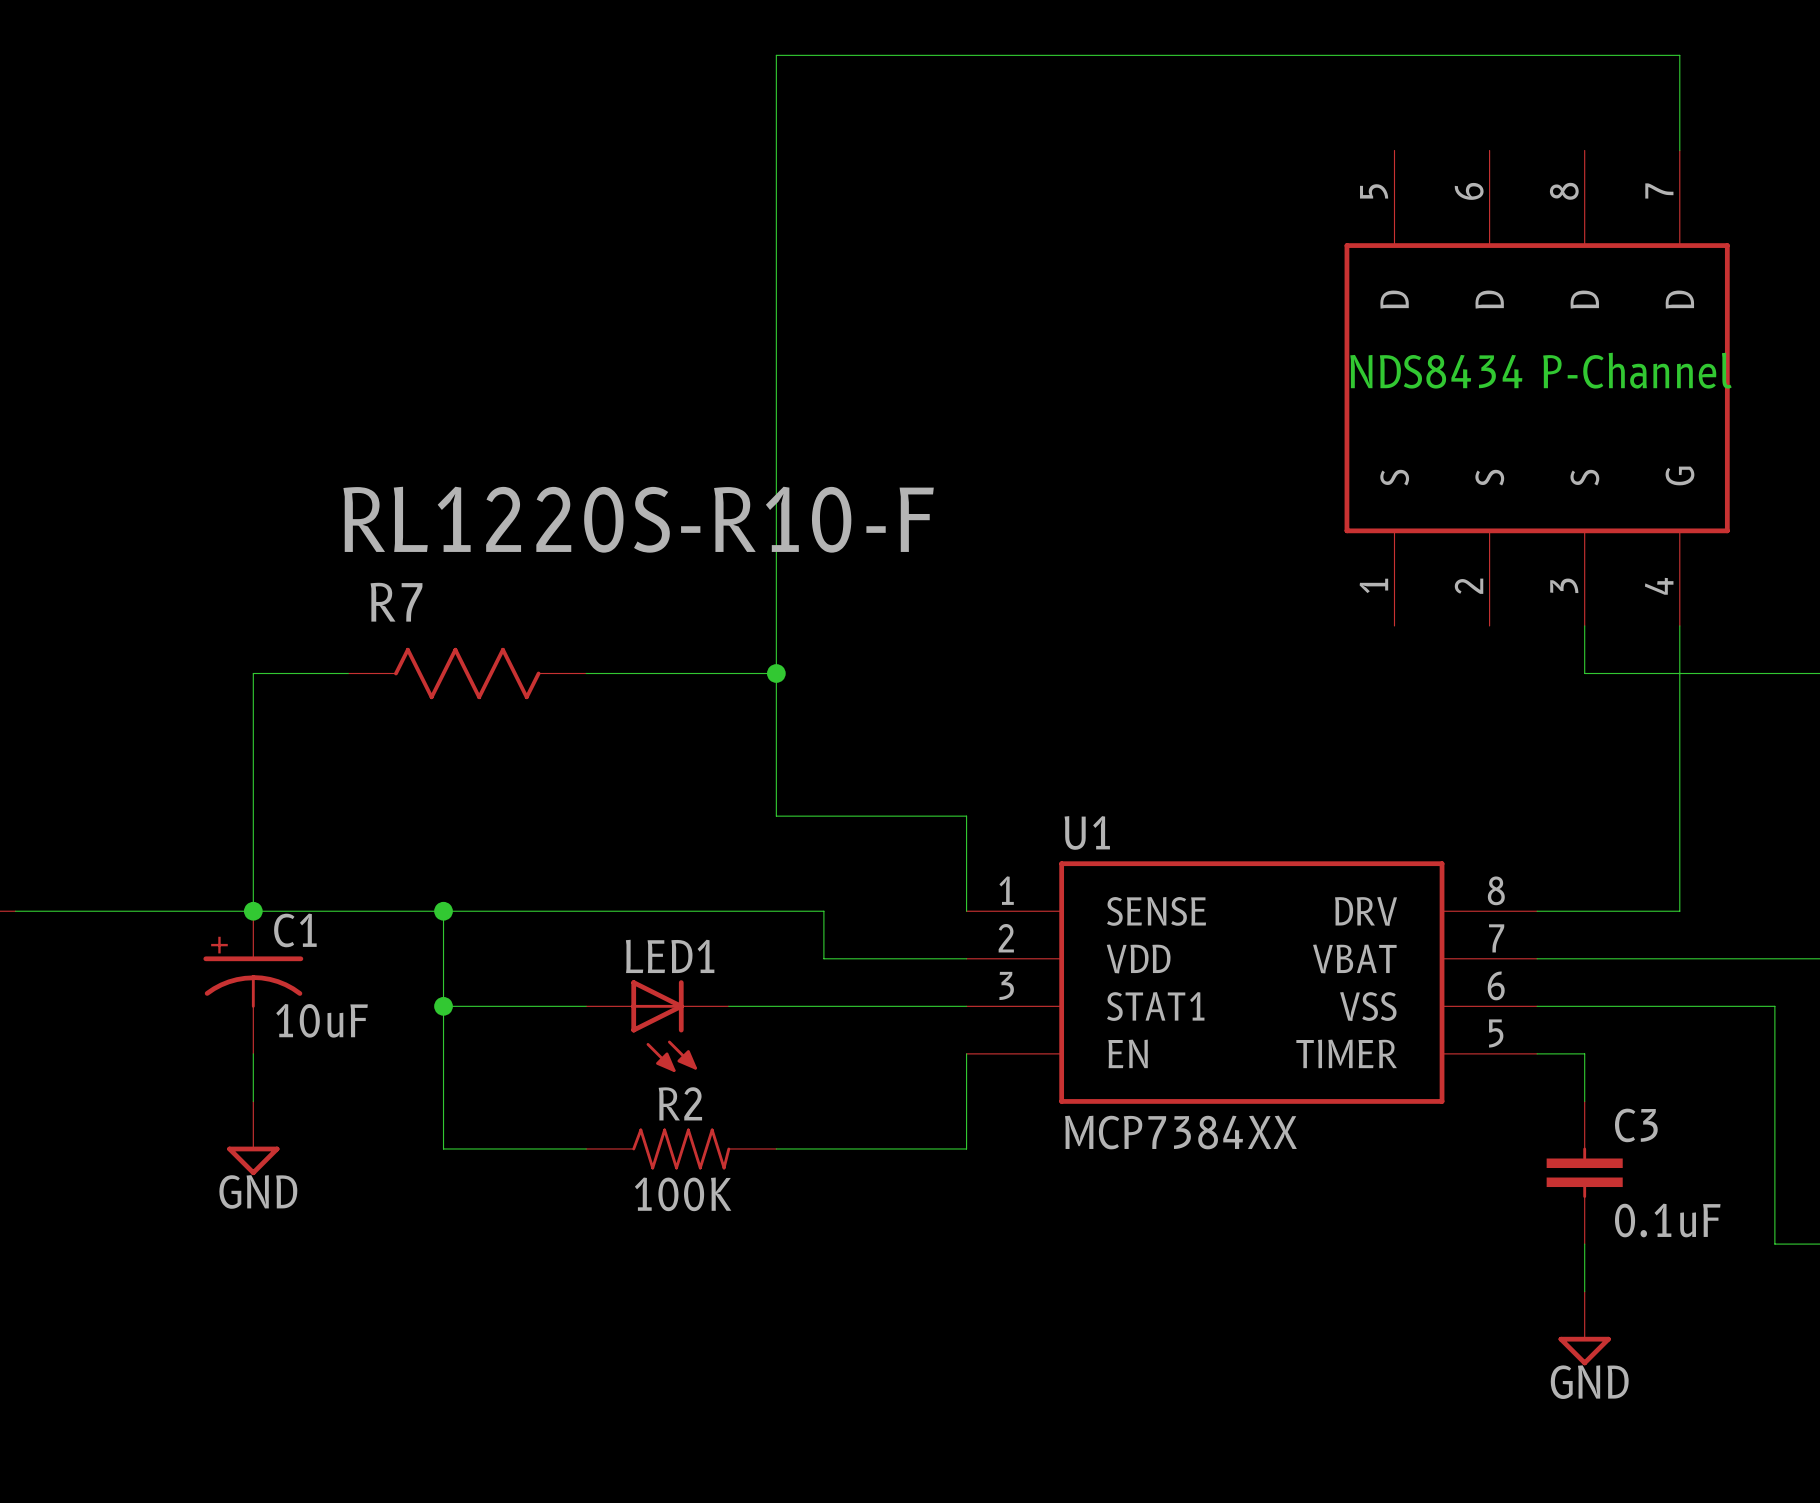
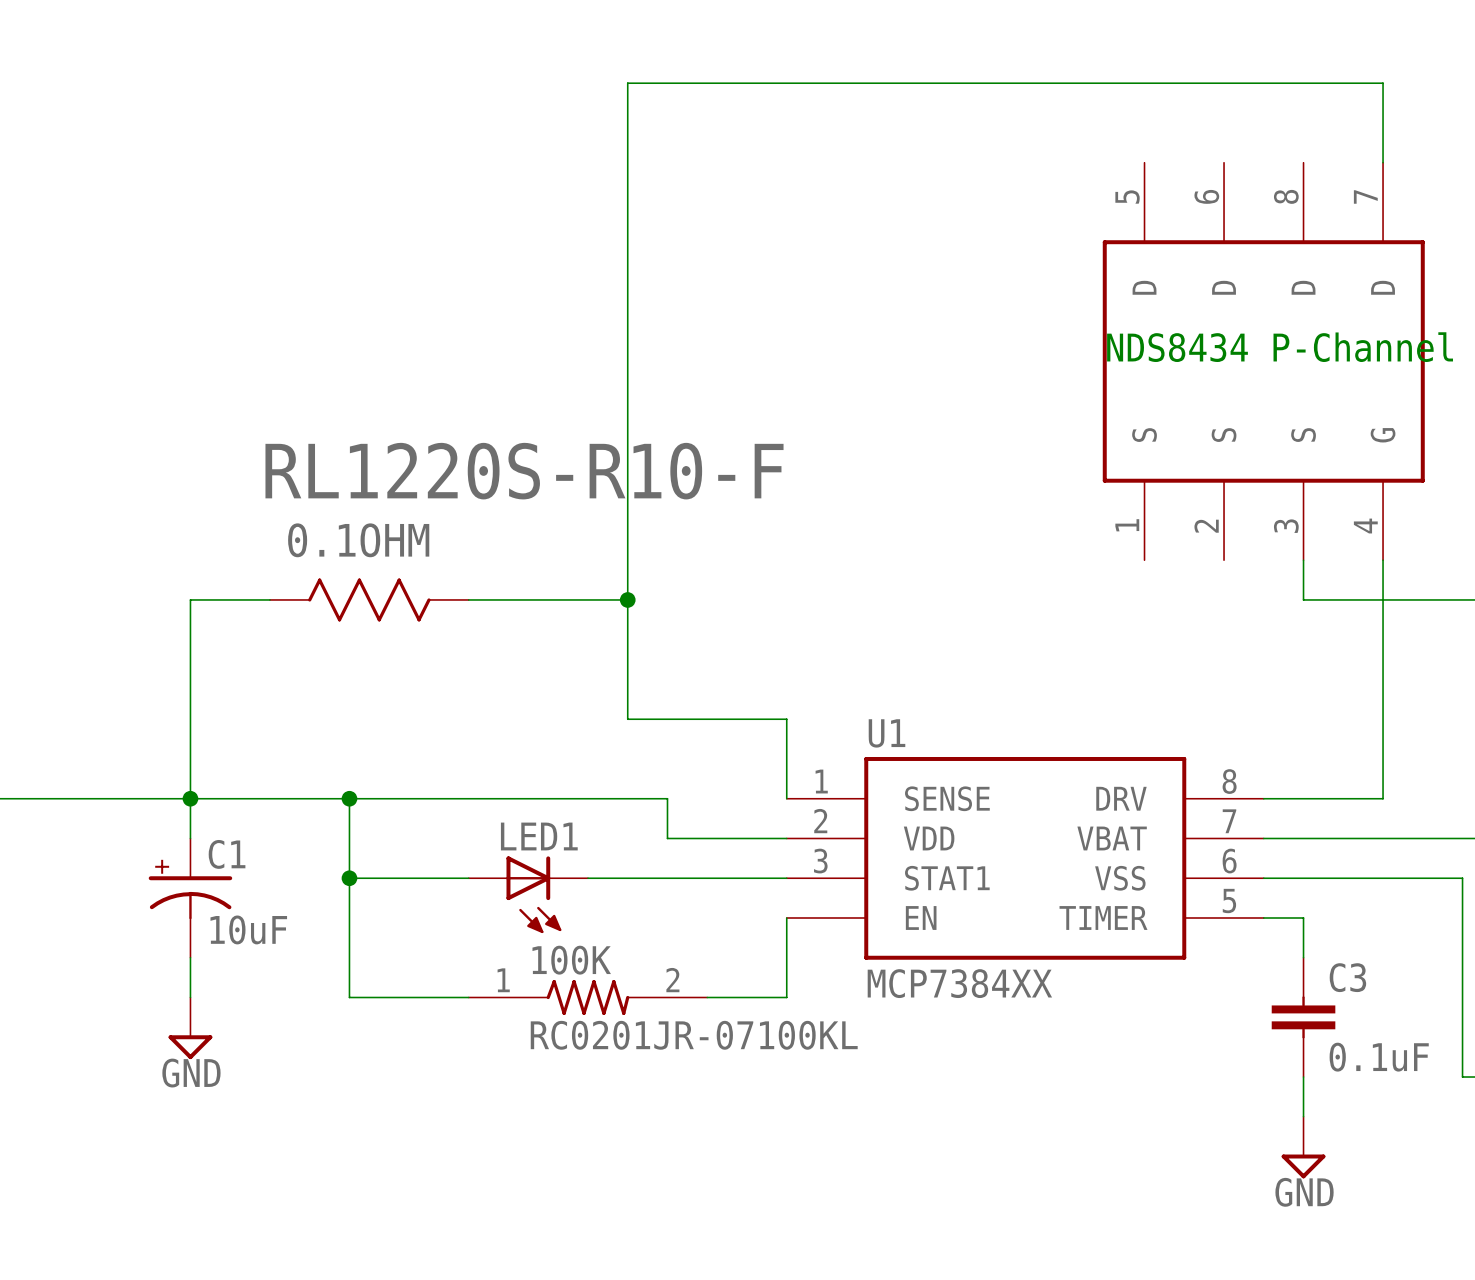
R7 name: R7 (396, 602) -> 0.1OHM (358, 540)
C1 position: (253, 982) -> (190, 898)
power symbol position: GND (253, 1138) -> GND (190, 1028)
R2: 100K (681, 1148) -> none
100K: none -> RC0201JR-07100KL (587, 997)

